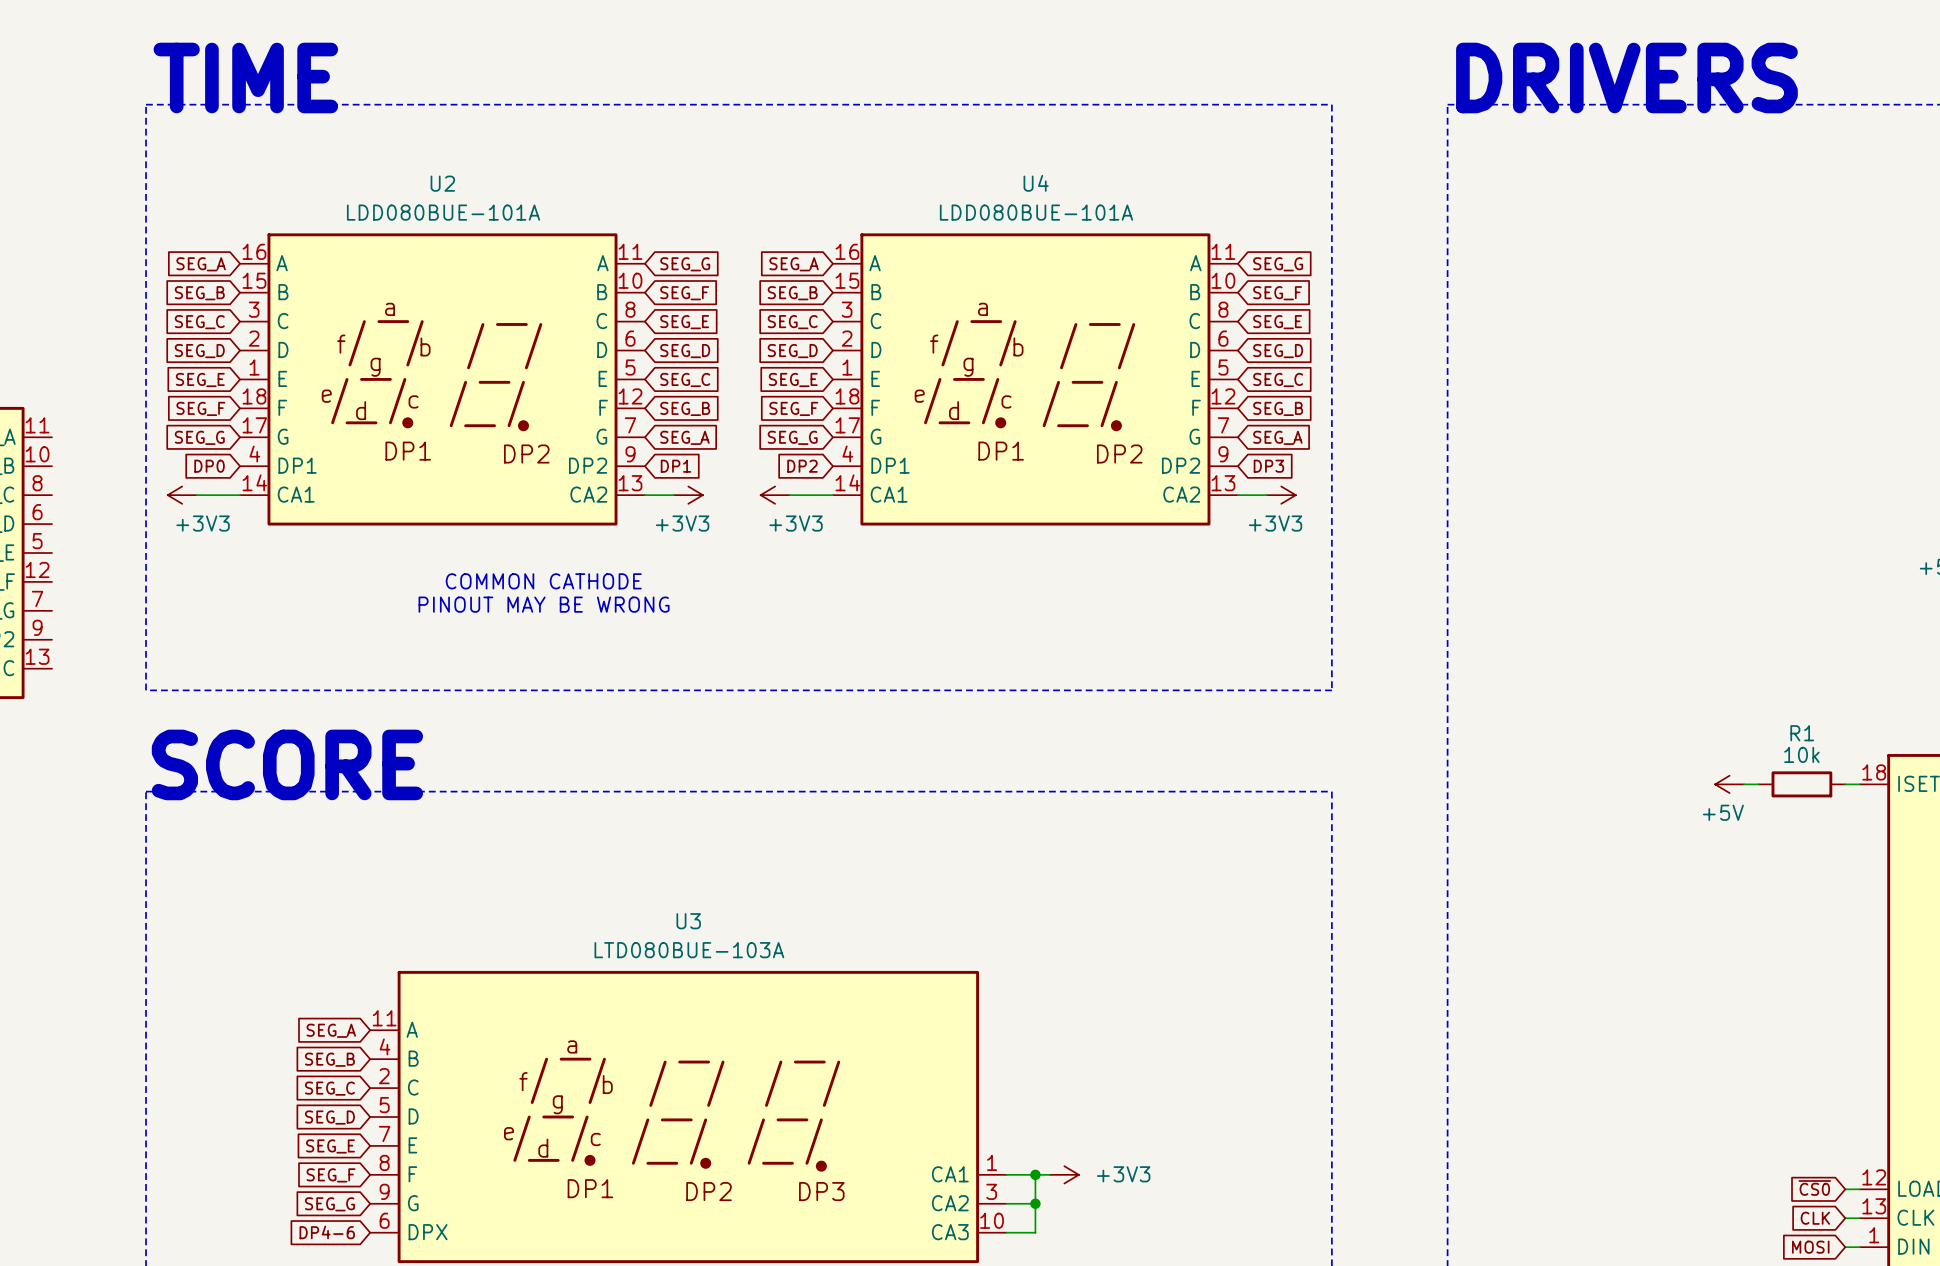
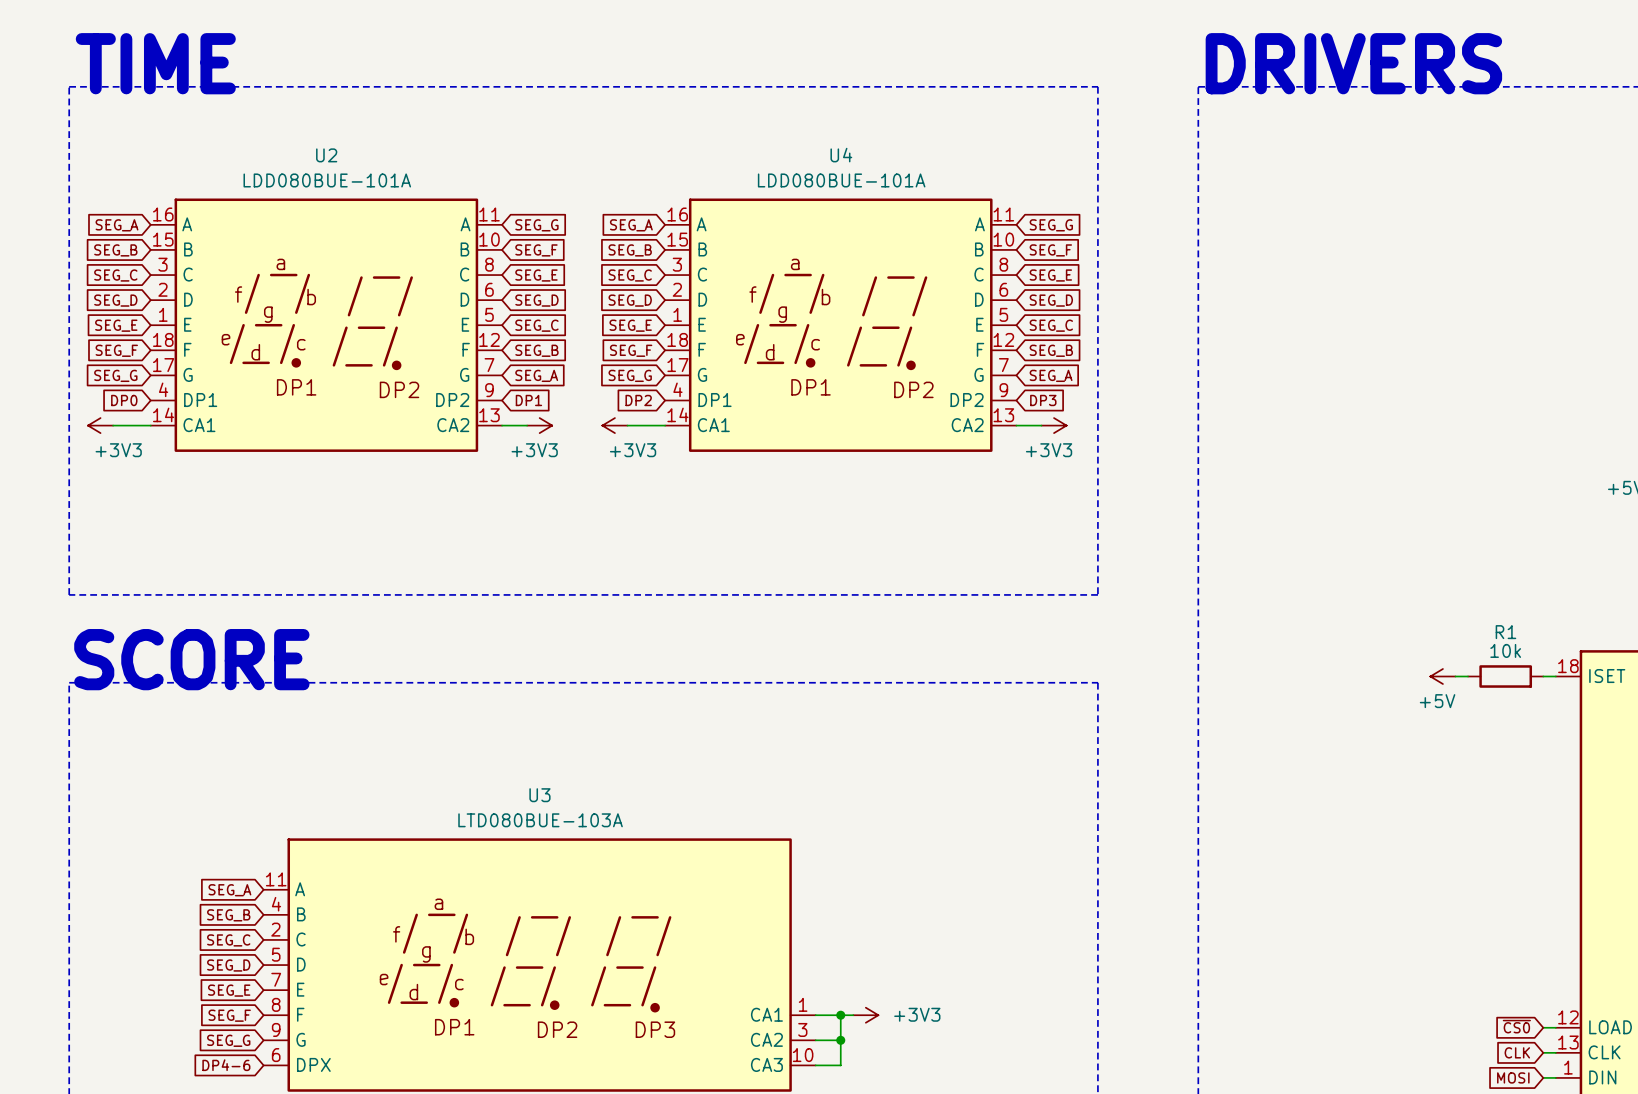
text: COMMON CATHODE (543, 581) -> none
text: PINOUT MAY BE WRONG (544, 604) -> none

